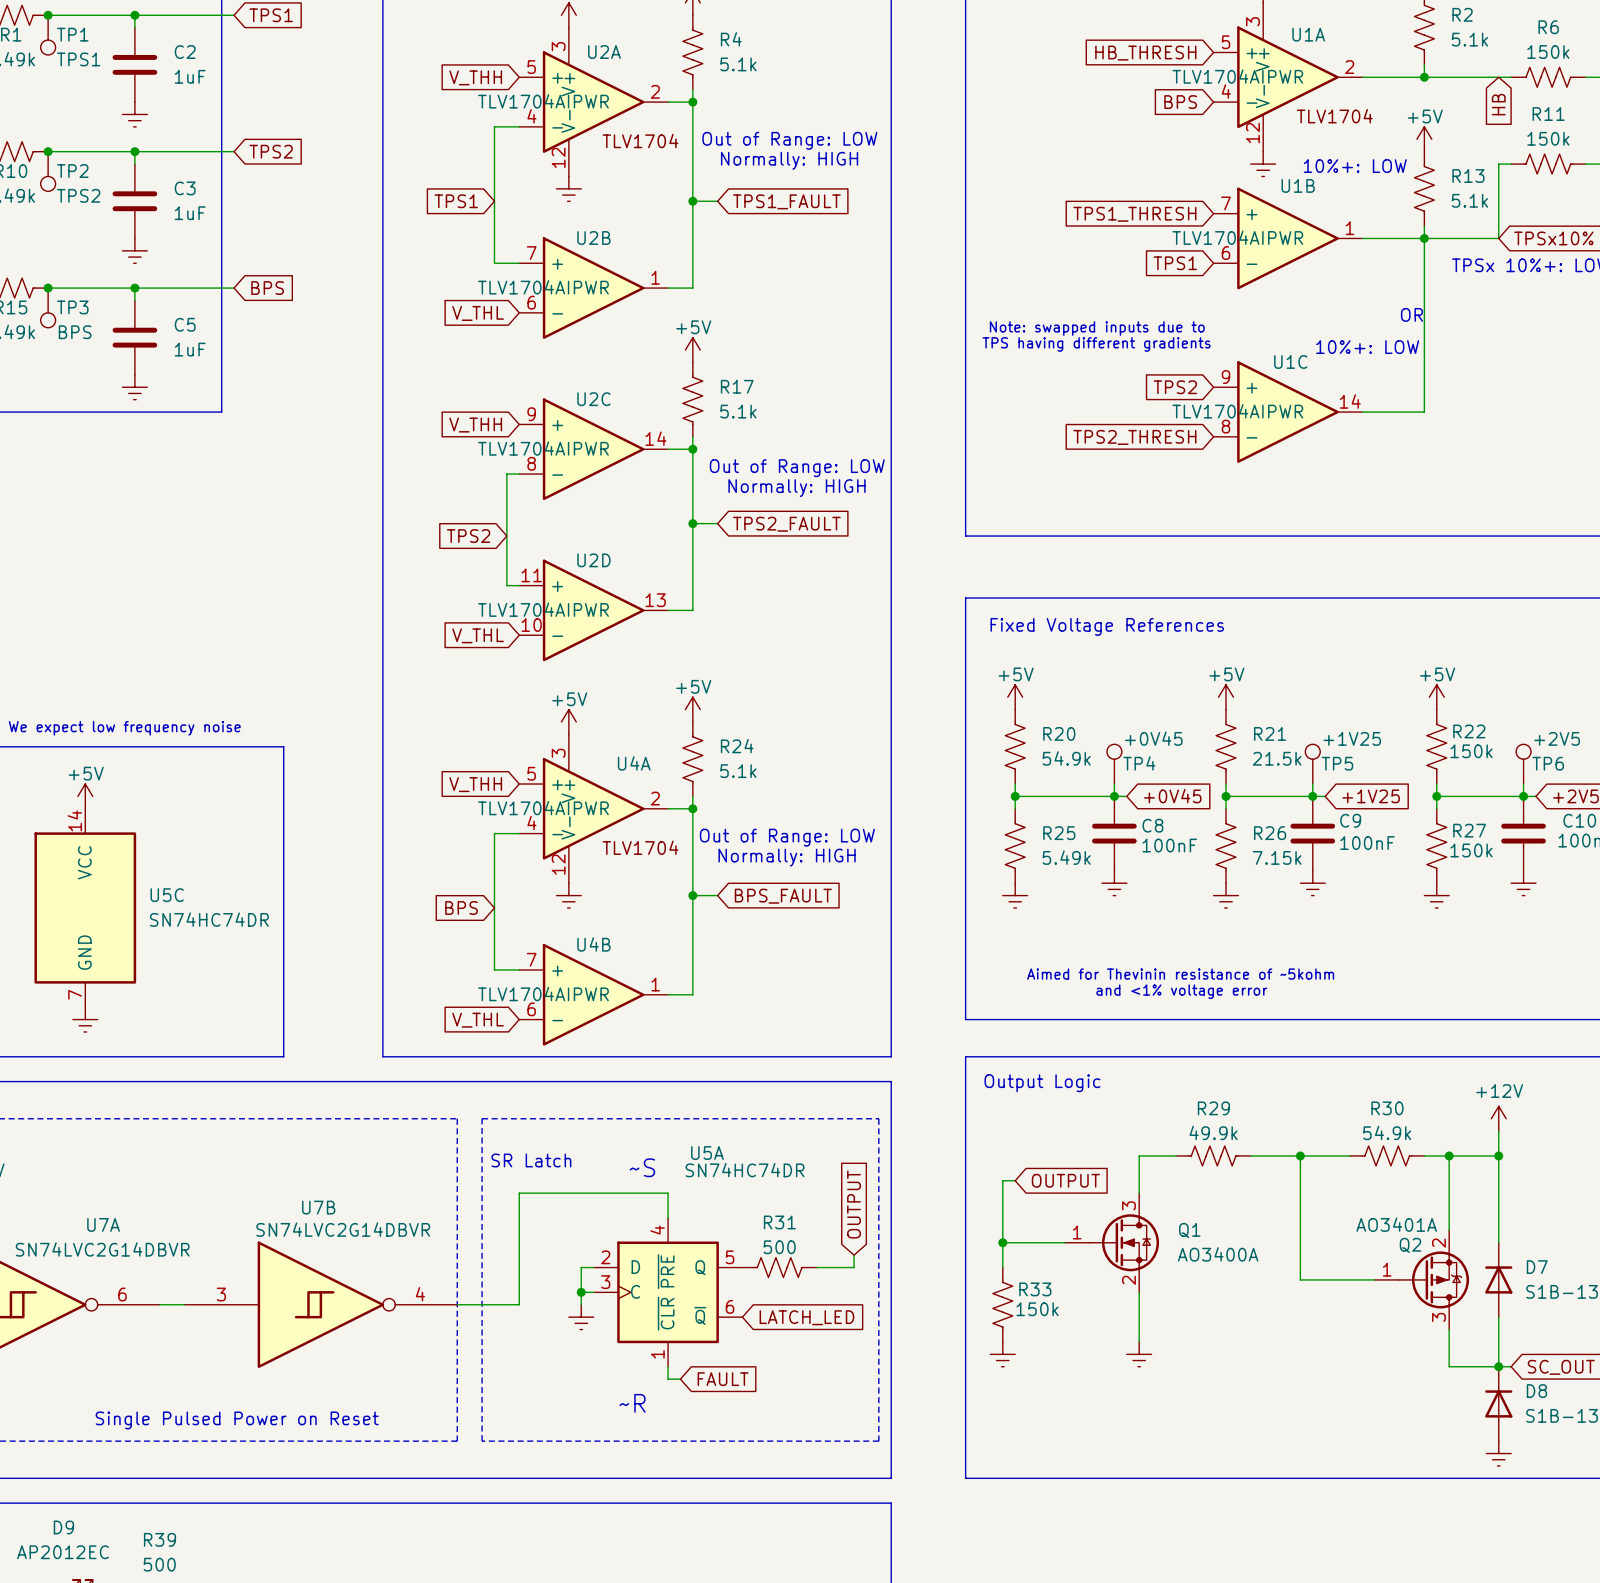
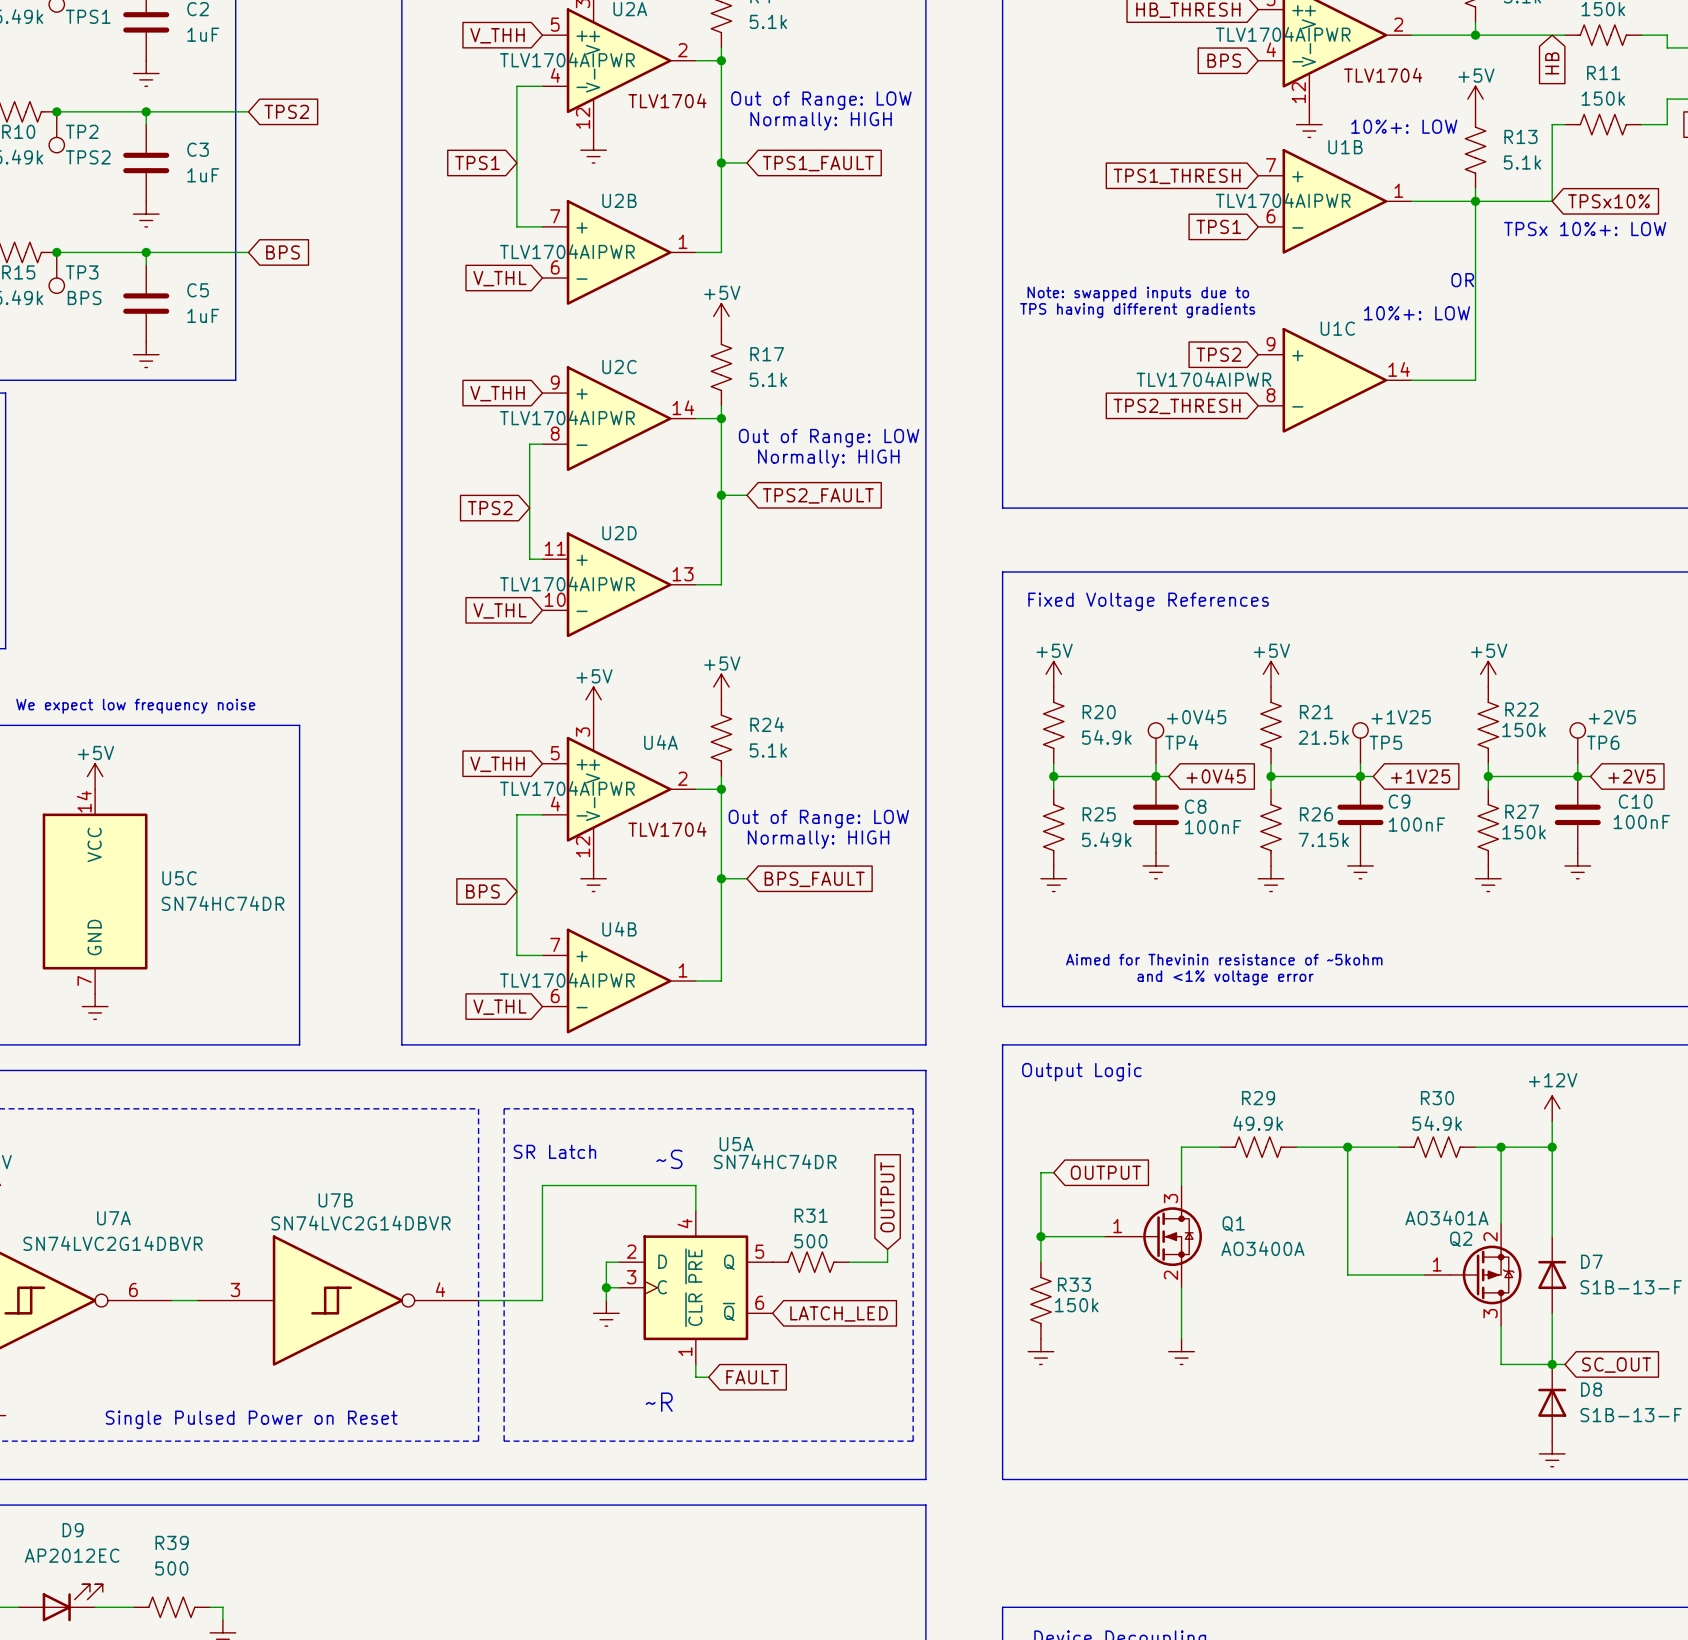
U1C value position: TLV1704AIPWR (1237, 411) -> TLV1704AIPWR (1203, 379)

